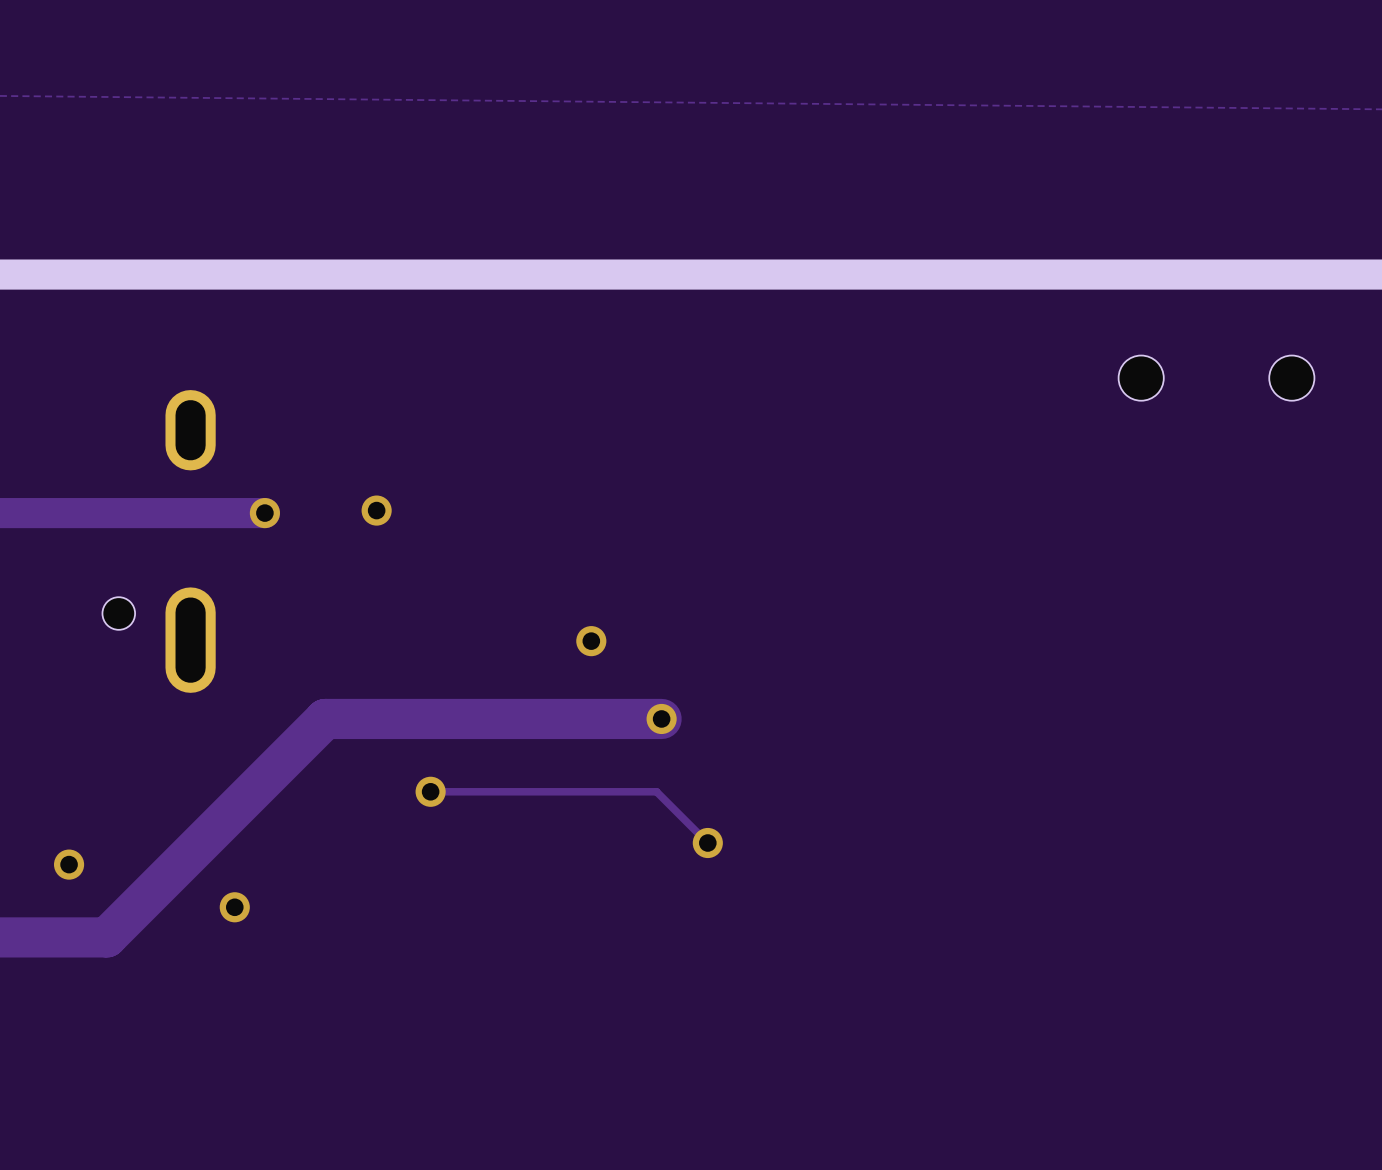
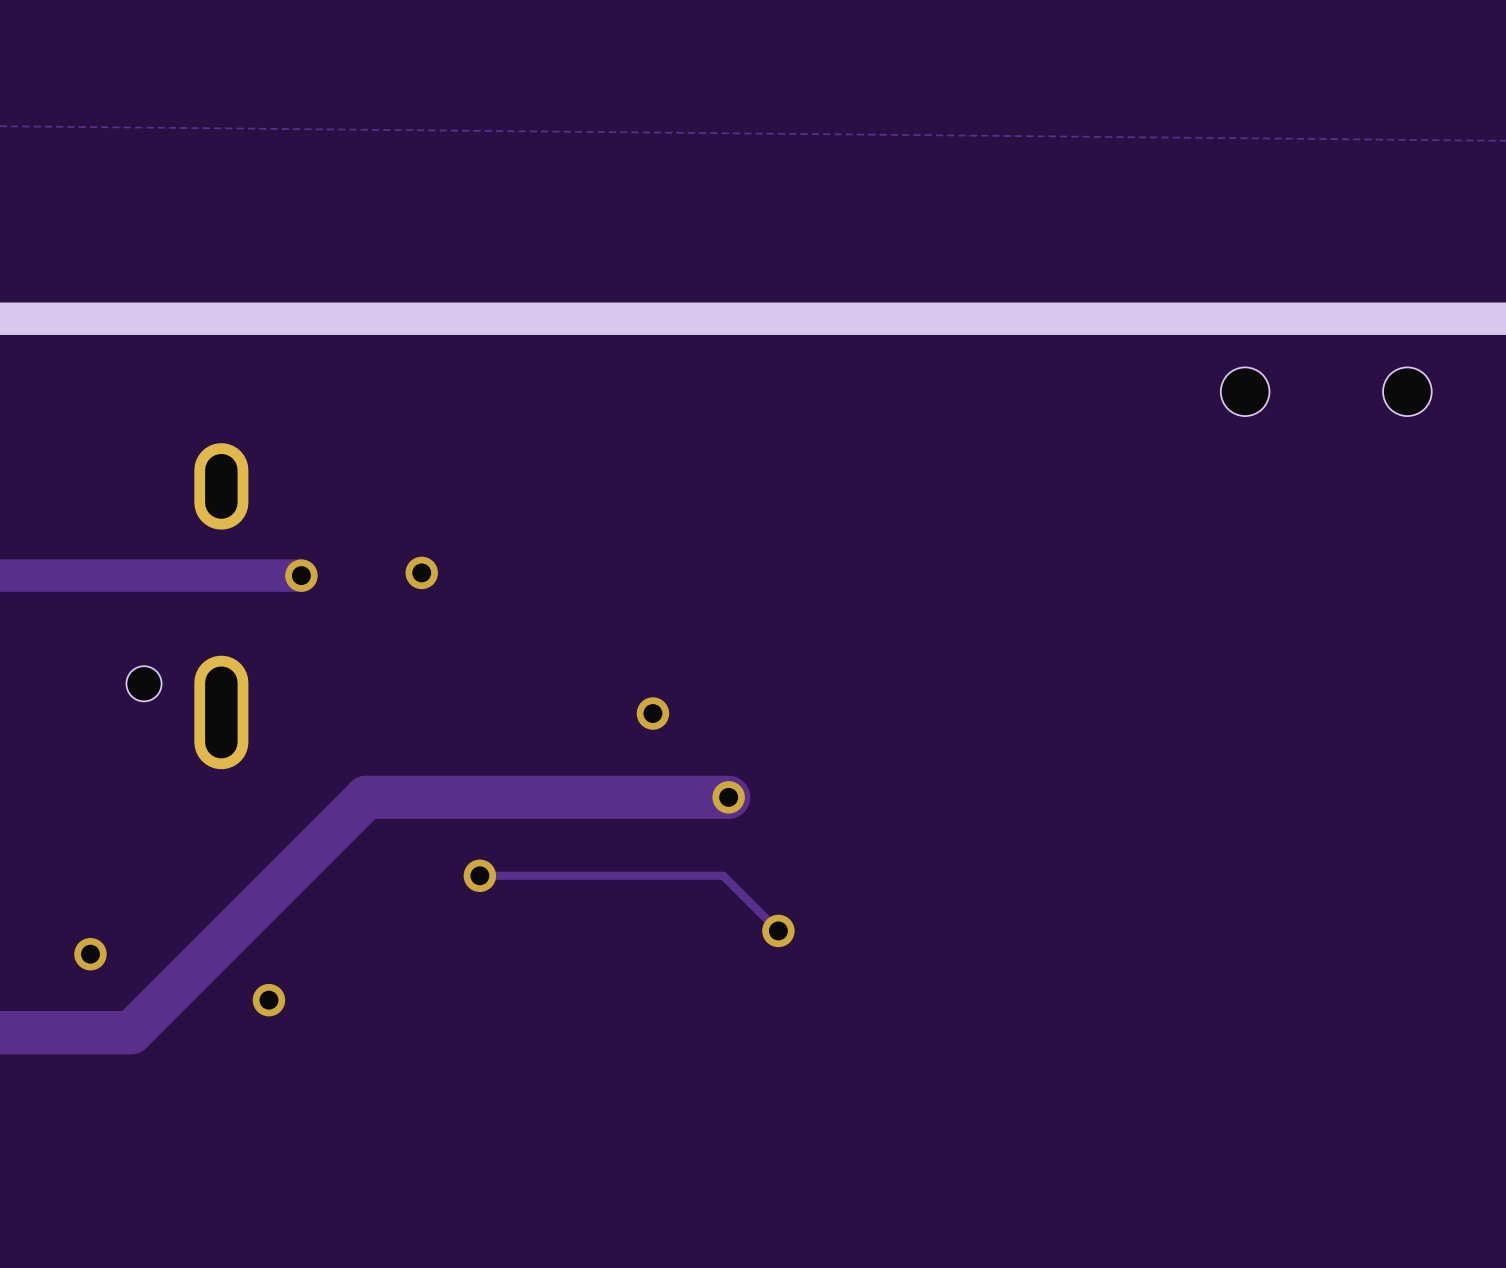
part position: (1216, 378) -> (1326, 391)

